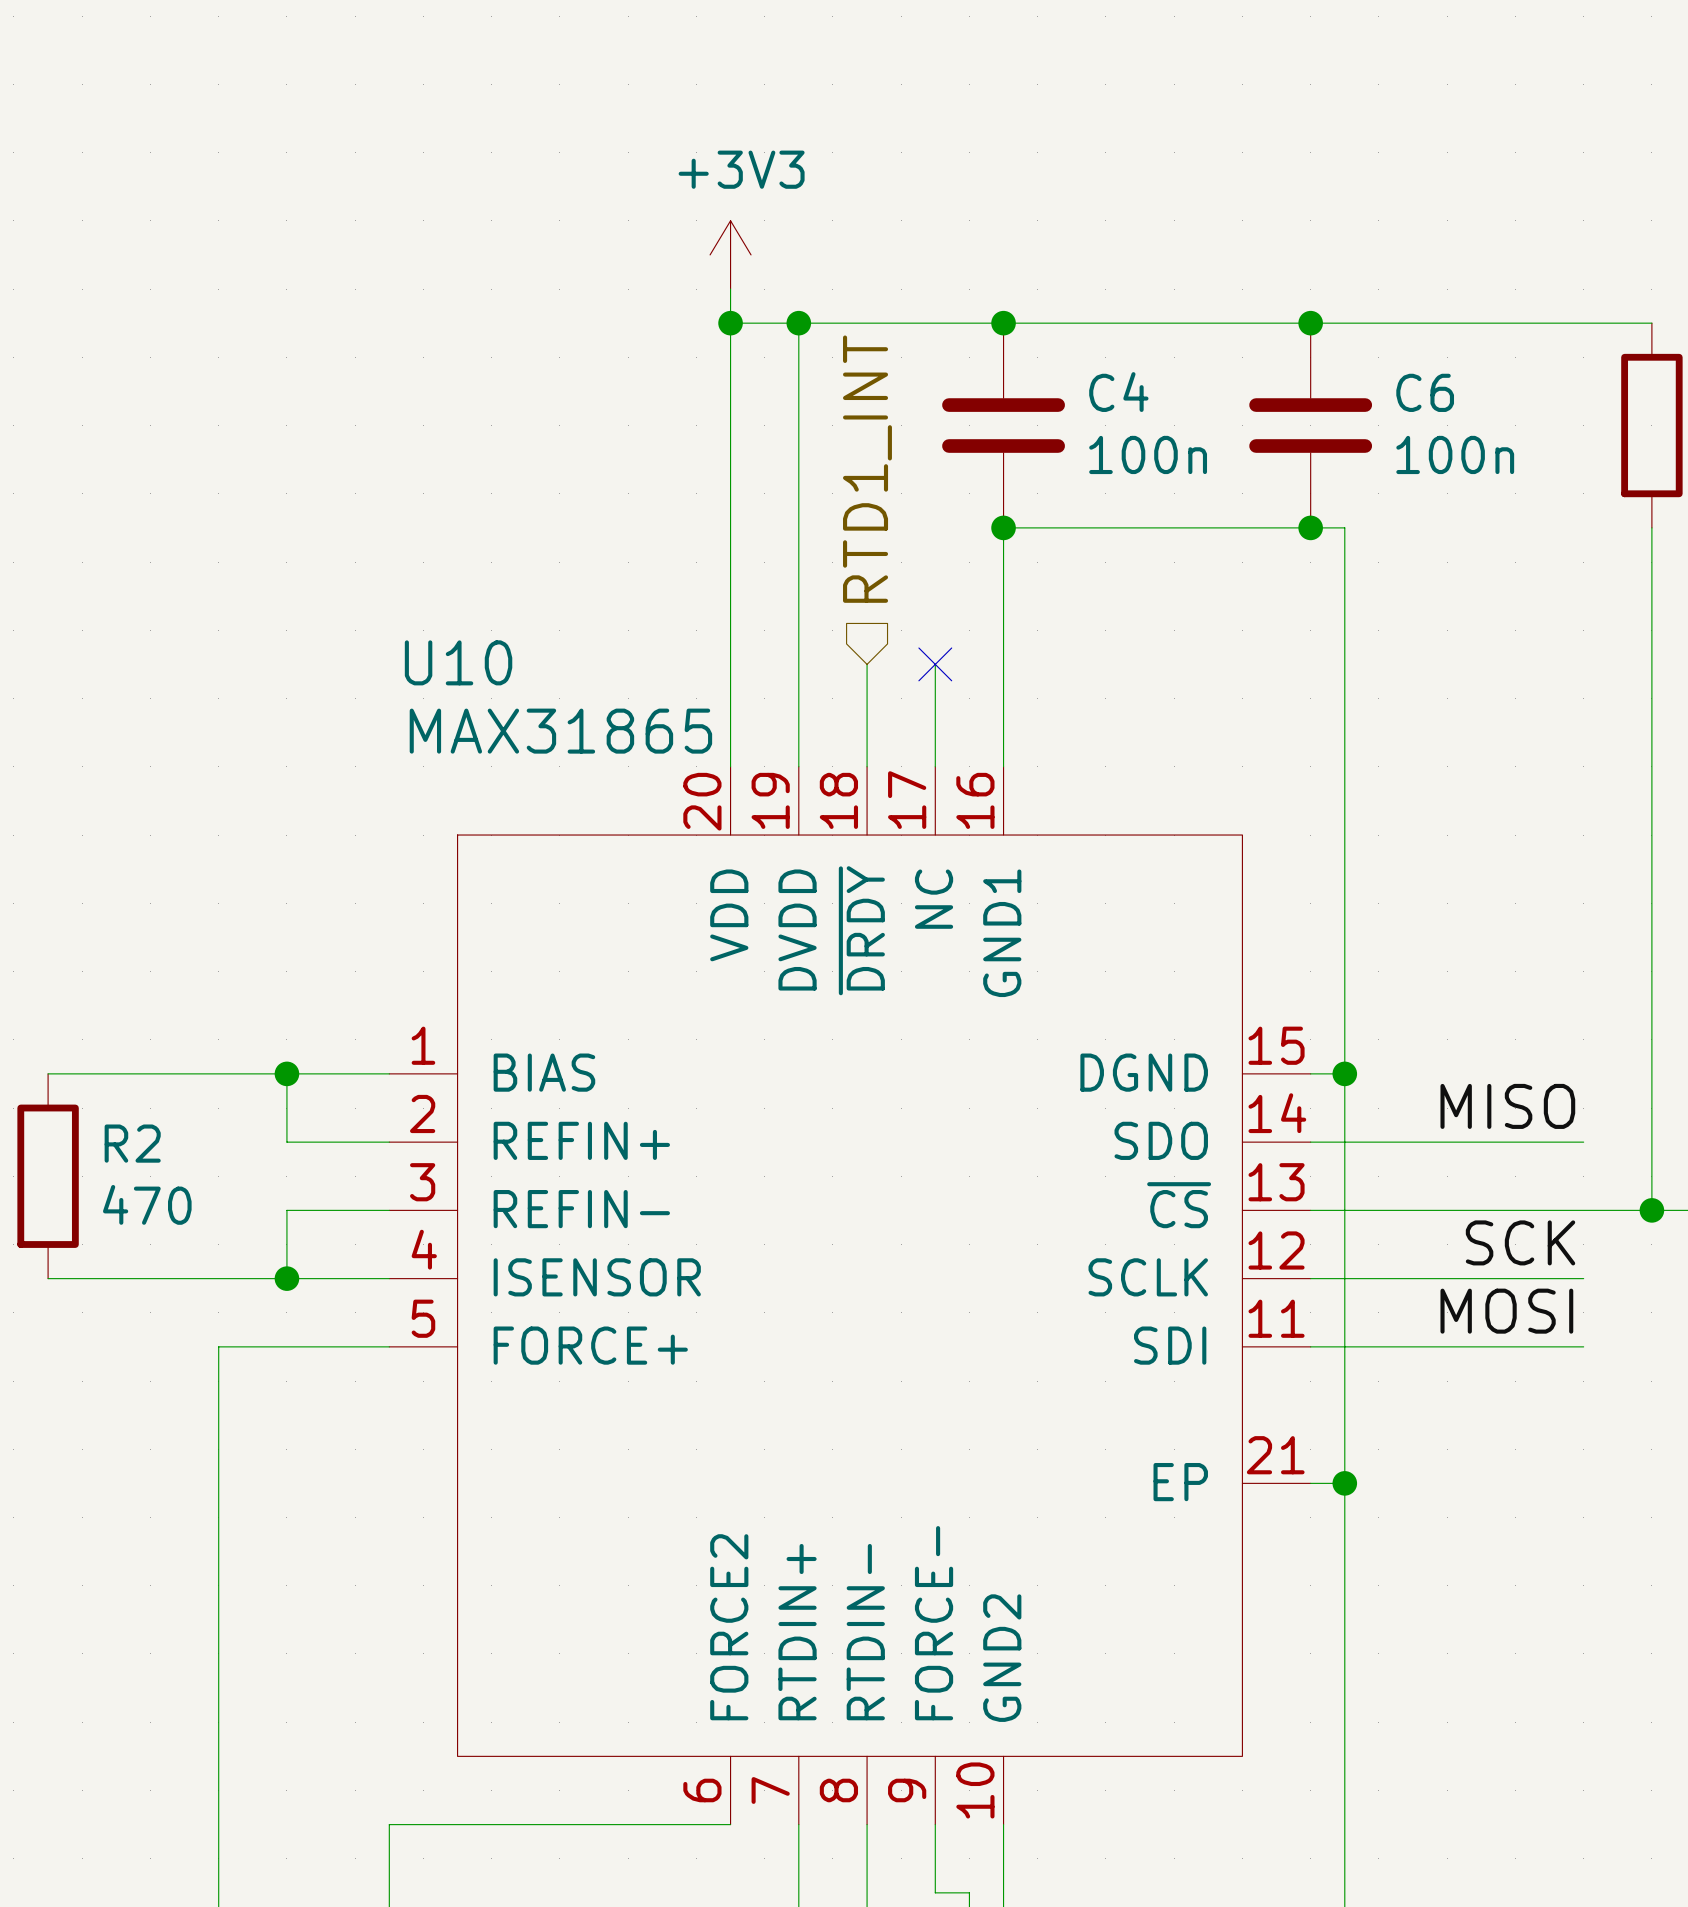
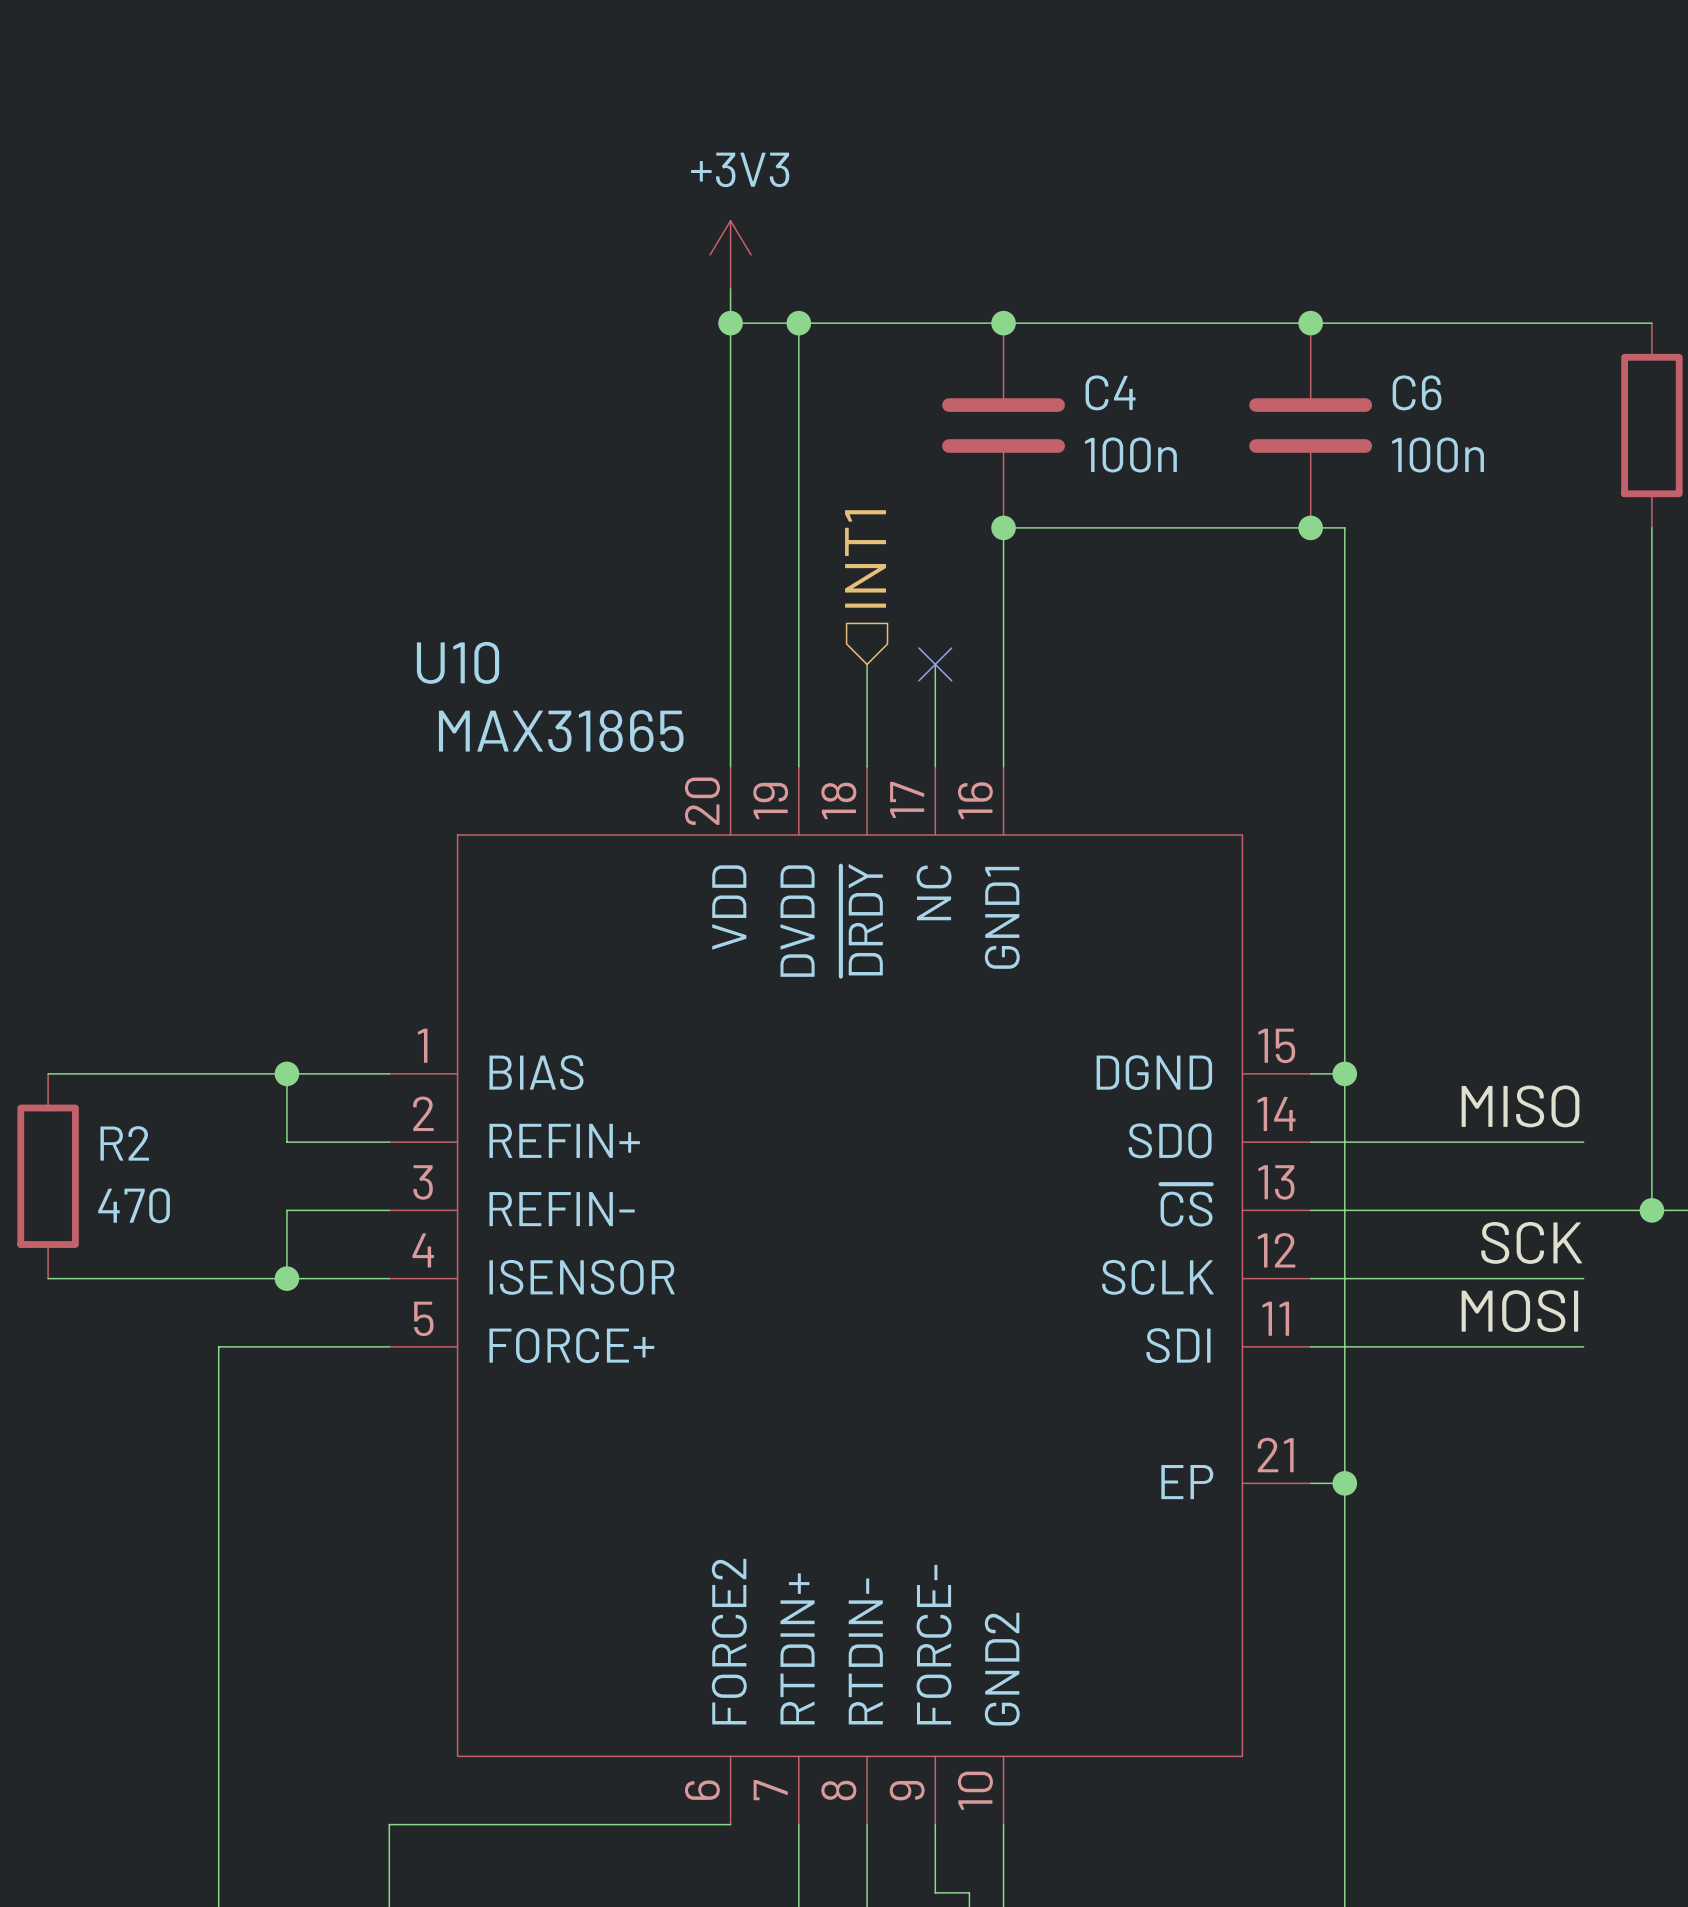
hierarchical label: RTD1_INT (867, 469) -> INT1 (865, 558)

